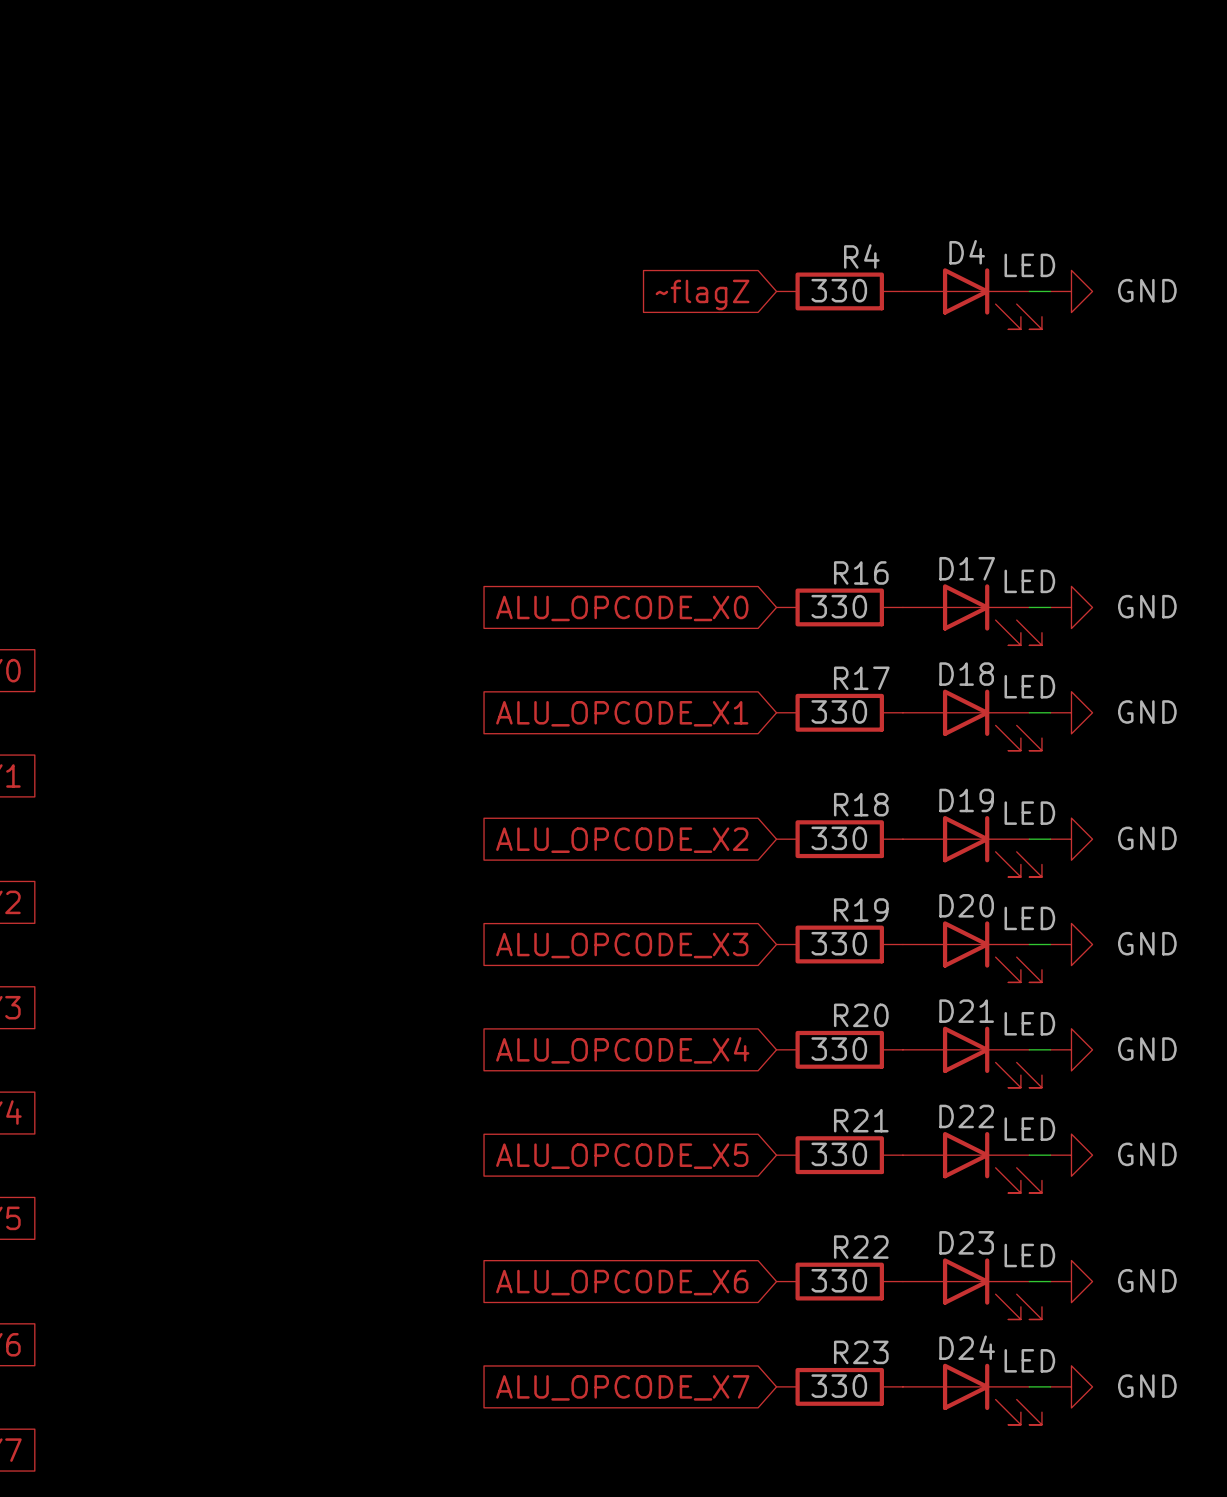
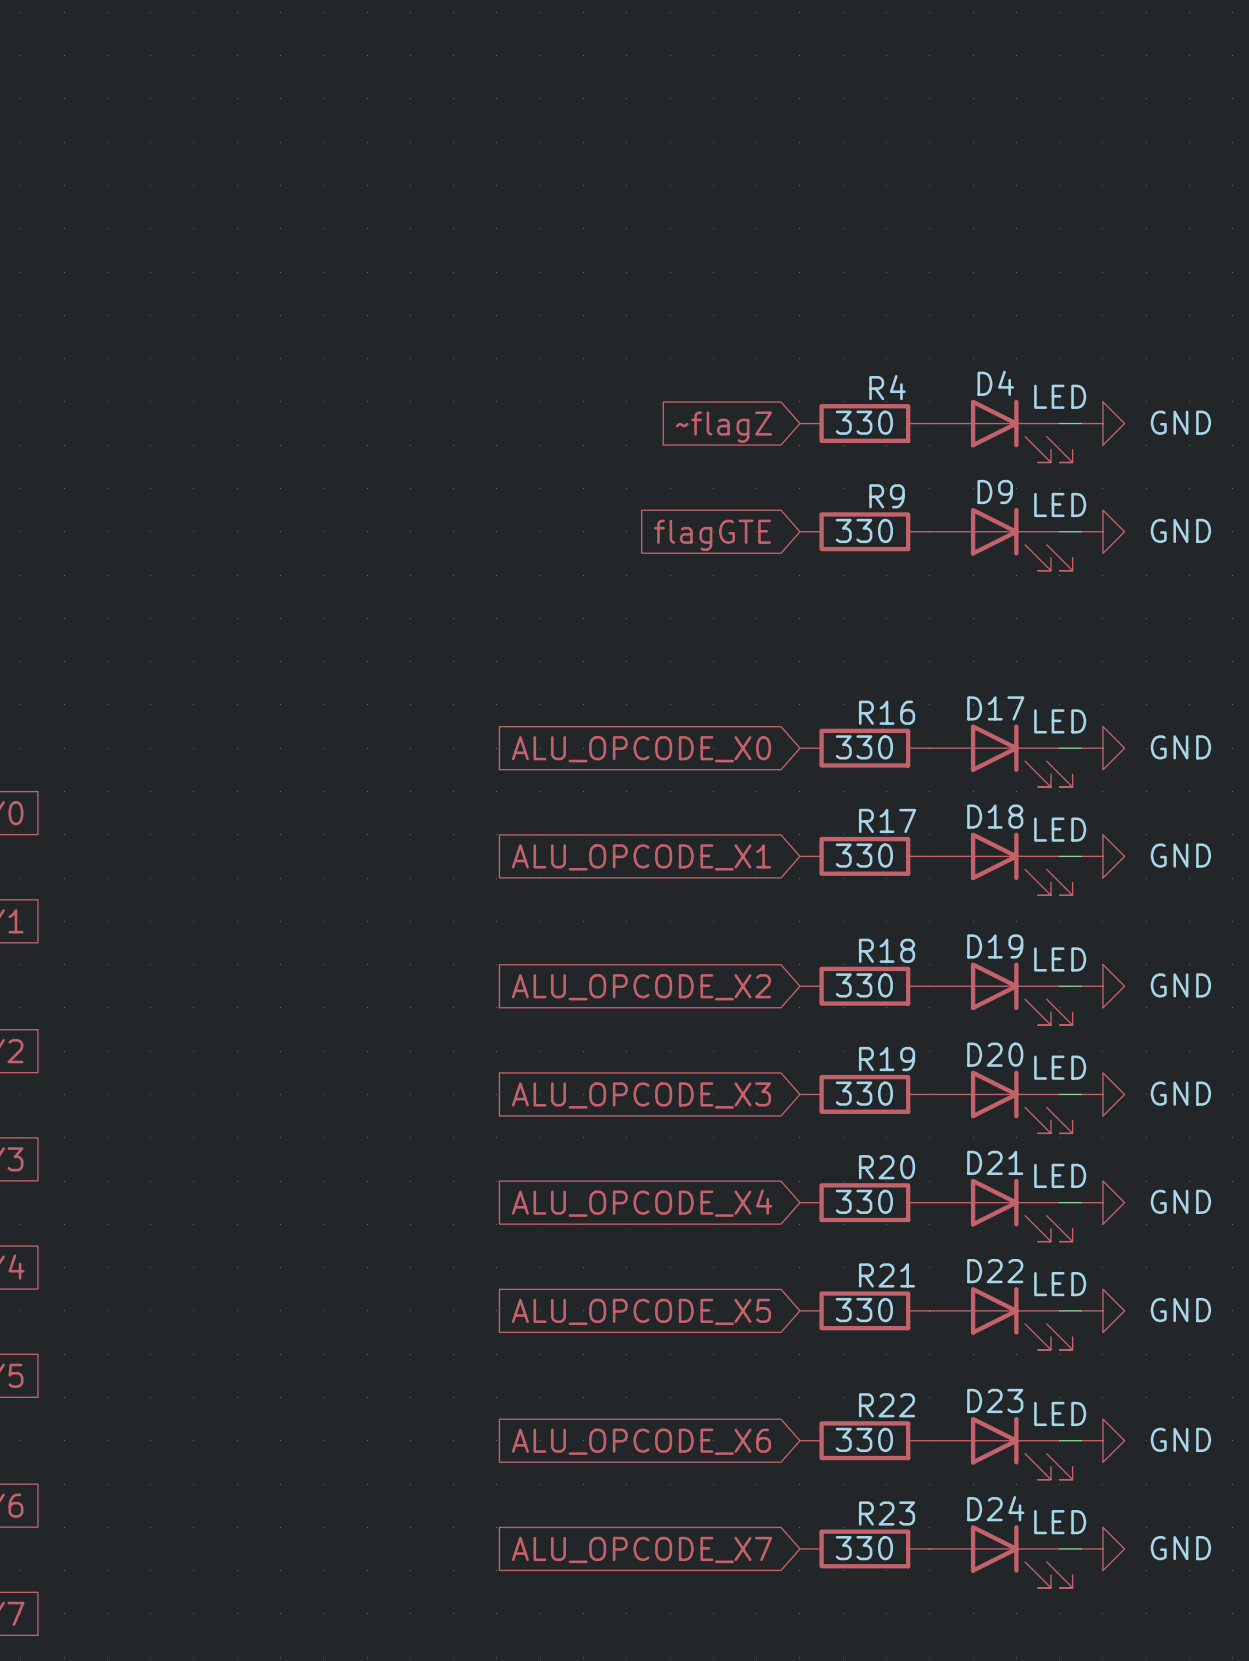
R9: none -> 330 (864, 531)
wire: none -> (1059, 531) (1081, 531)
power symbol: none -> GND (1102, 531)
global label: none -> flagGTE (712, 535)
D9: none -> LED (1001, 539)

